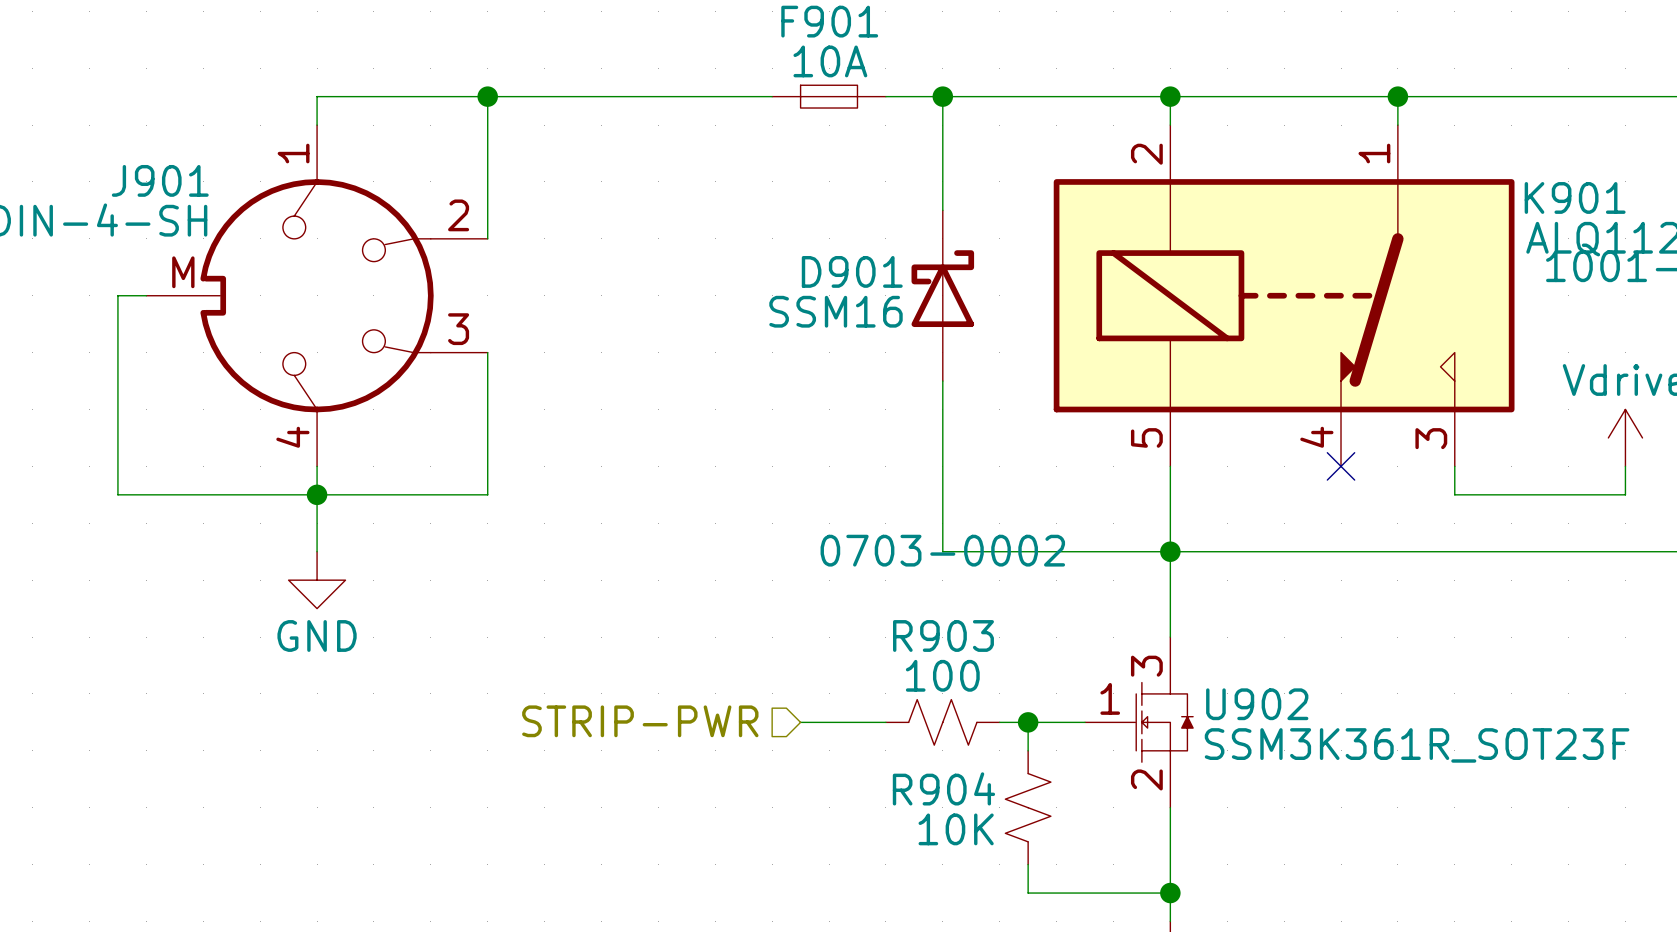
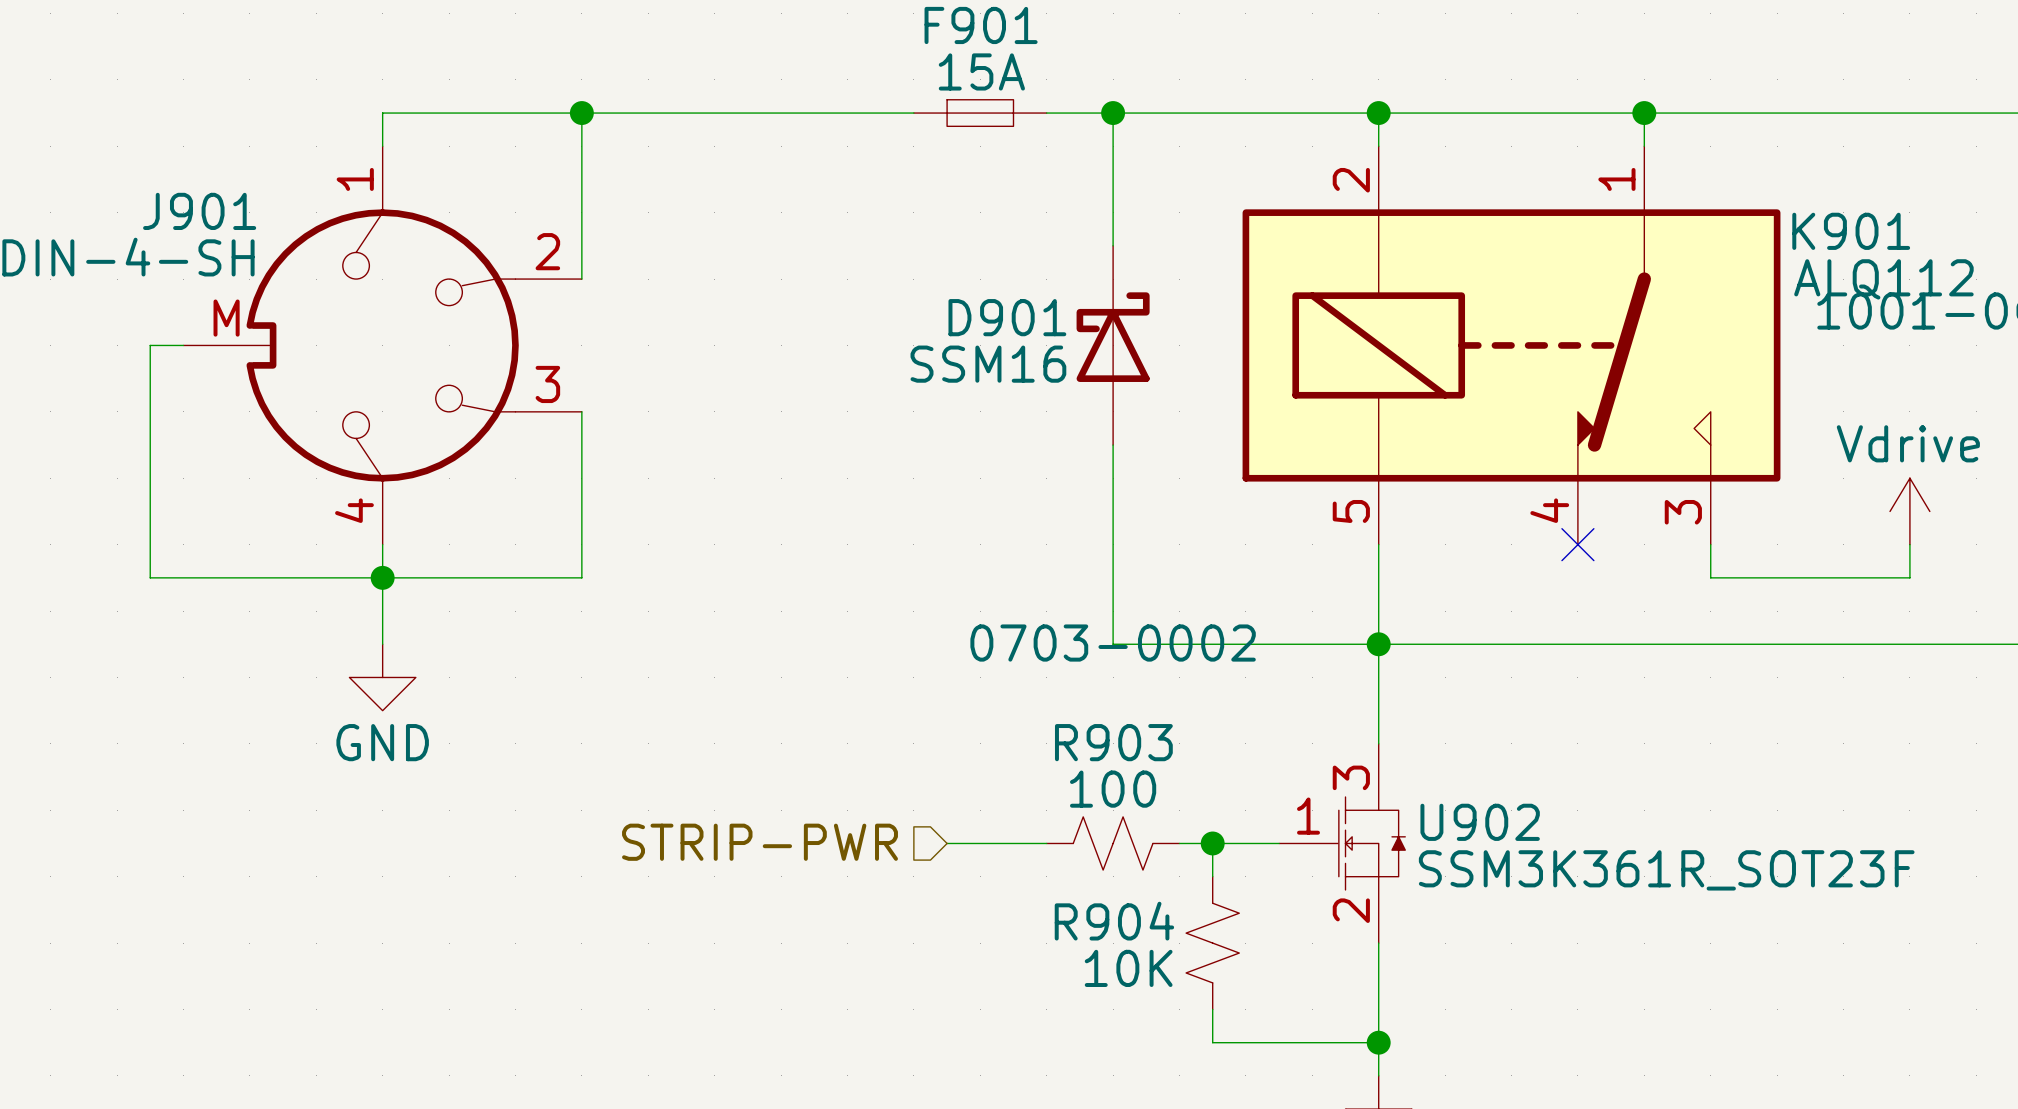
F901 value: 10A (830, 61) -> 15A (981, 71)

